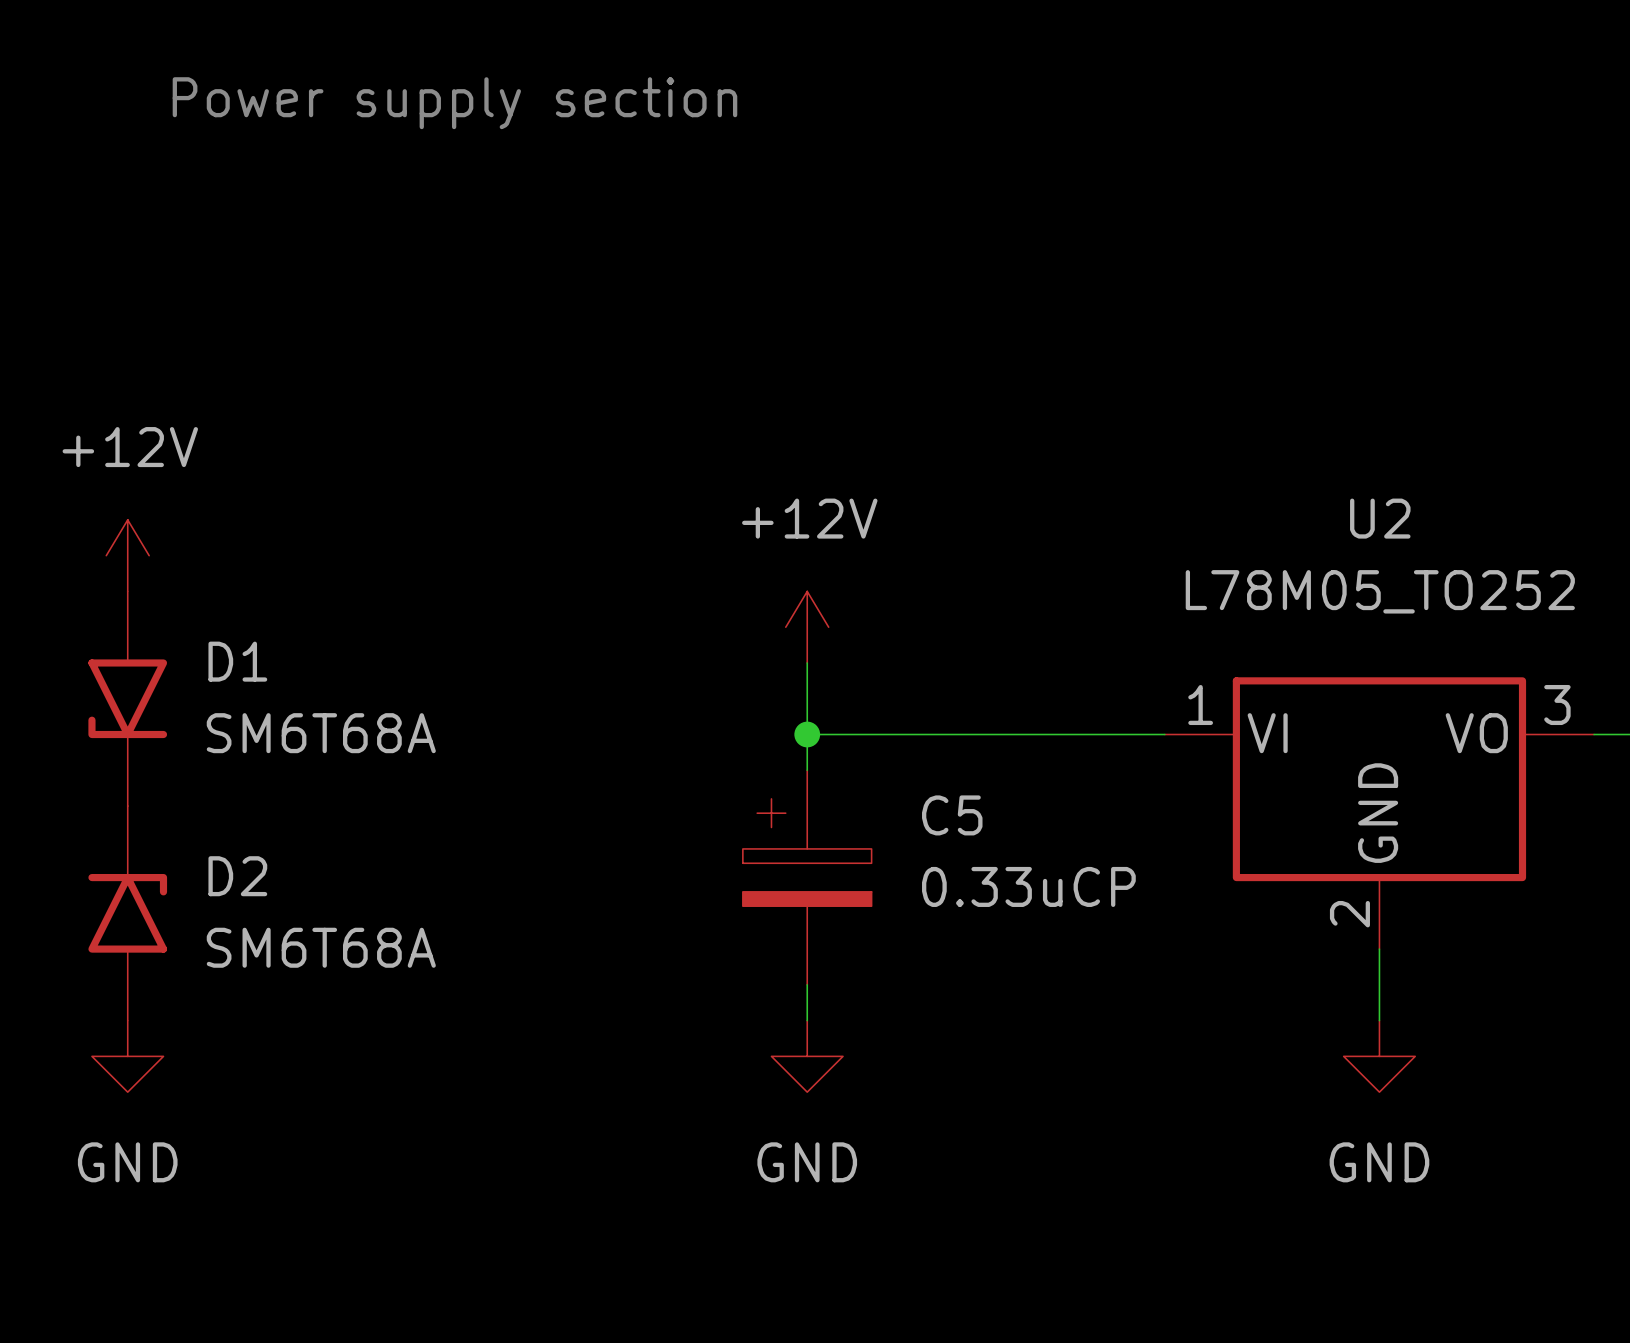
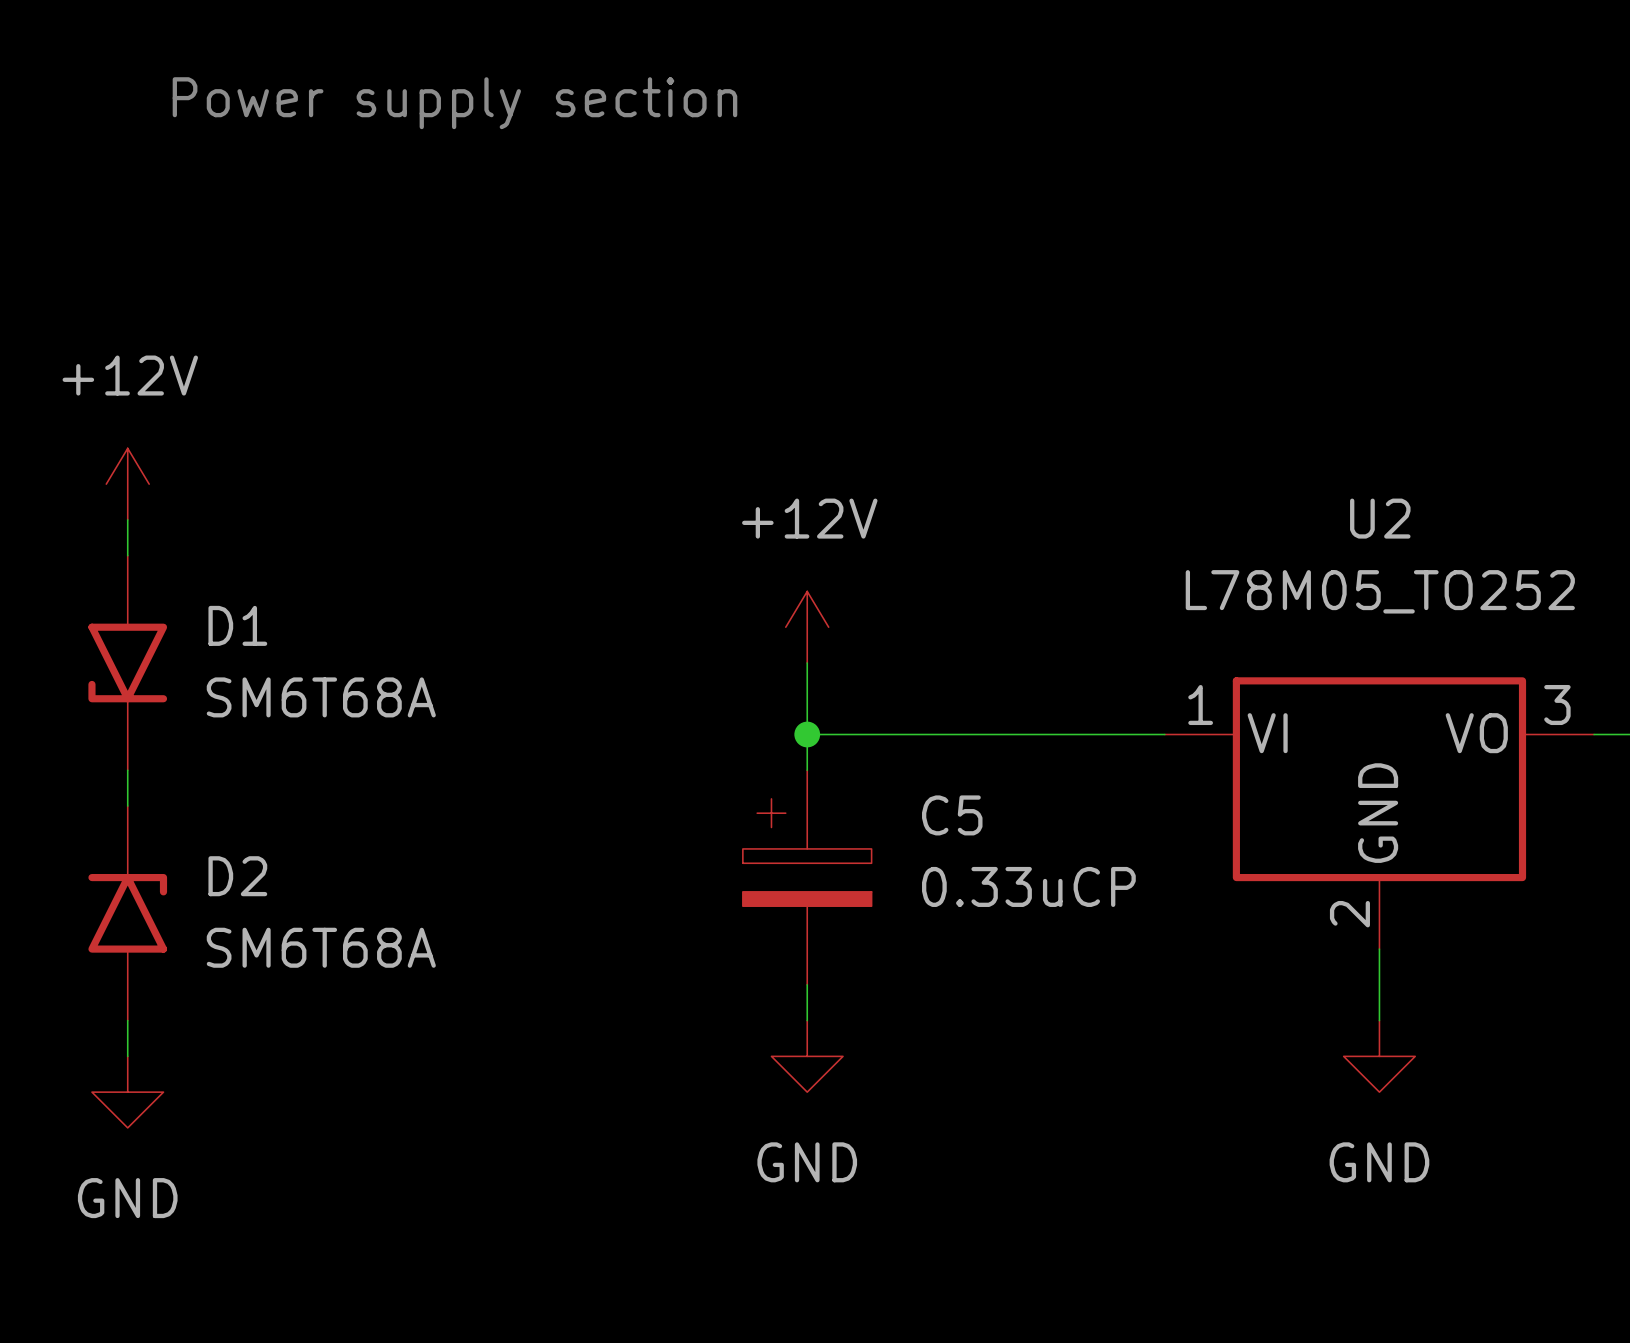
power symbol position: +12V (127, 555) -> +12V (127, 484)
D1 position: (127, 698) -> (127, 662)
power symbol position: GND (127, 1056) -> GND (127, 1092)

